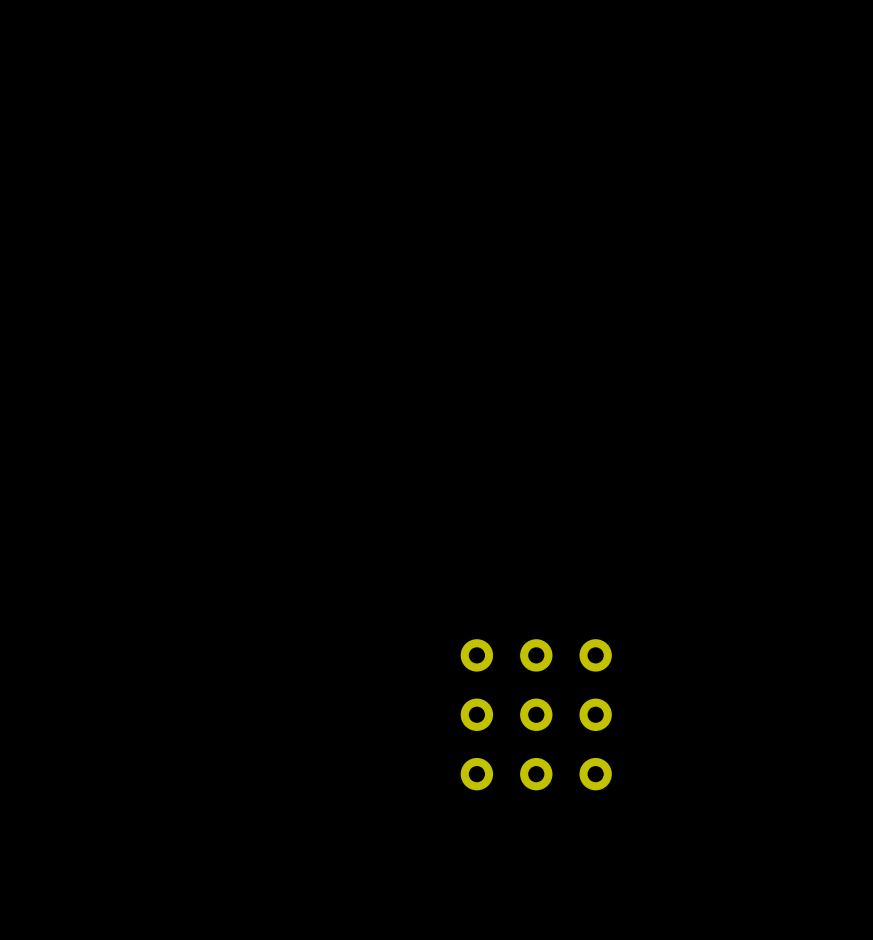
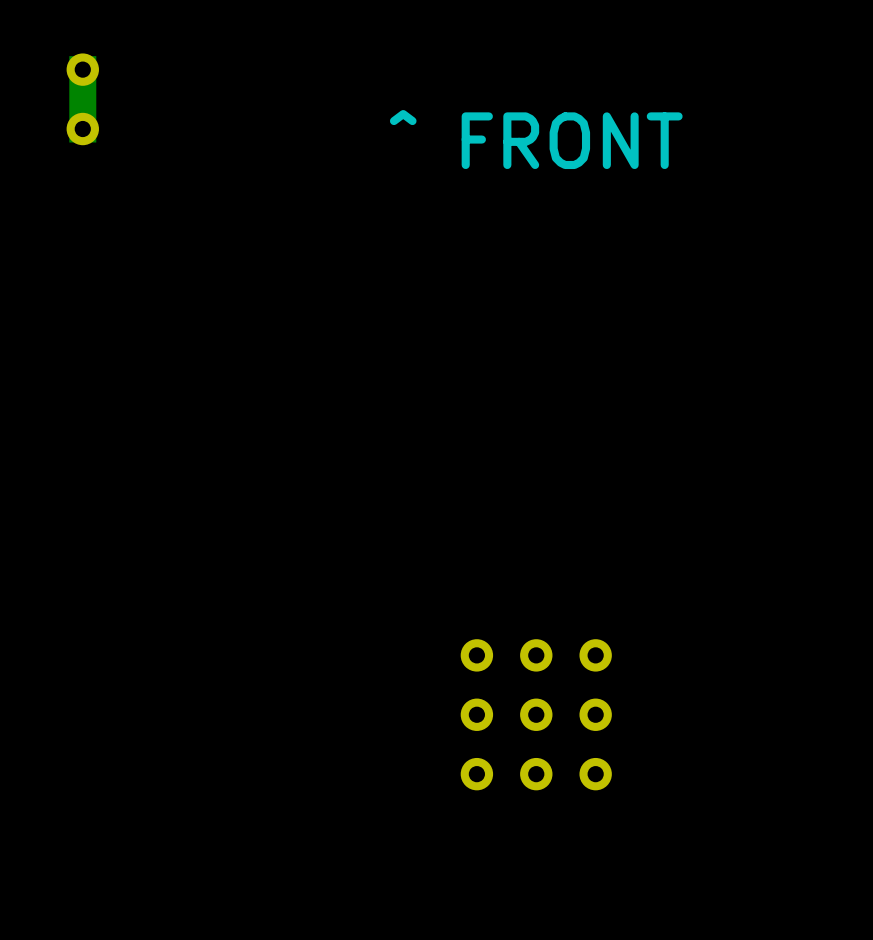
part: none -> (82, 99)
text: none -> ^ FRONT (536, 139)

